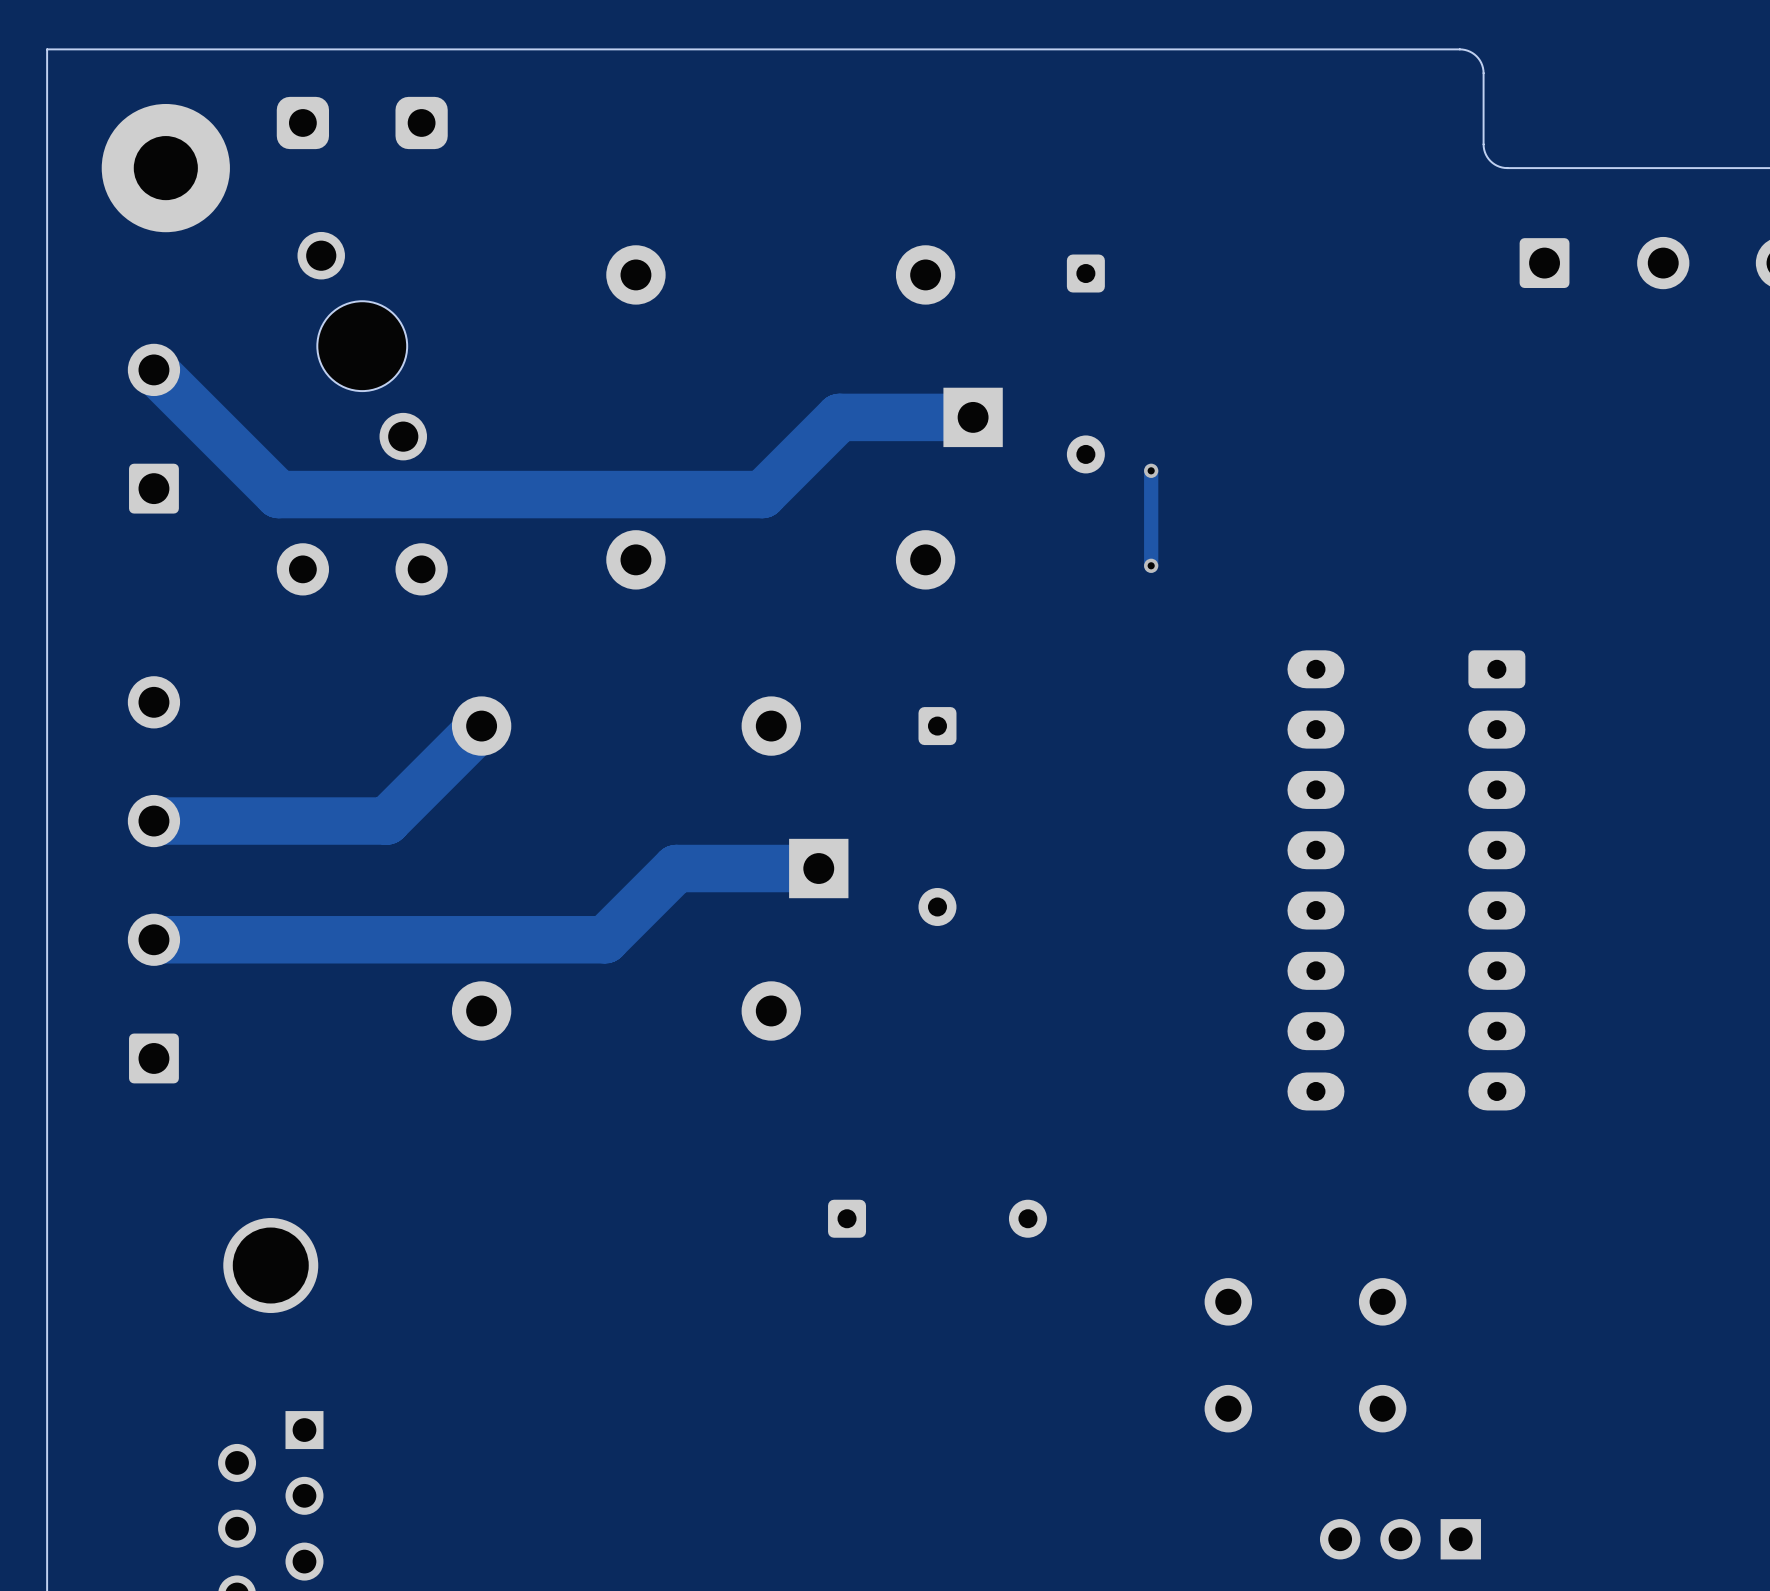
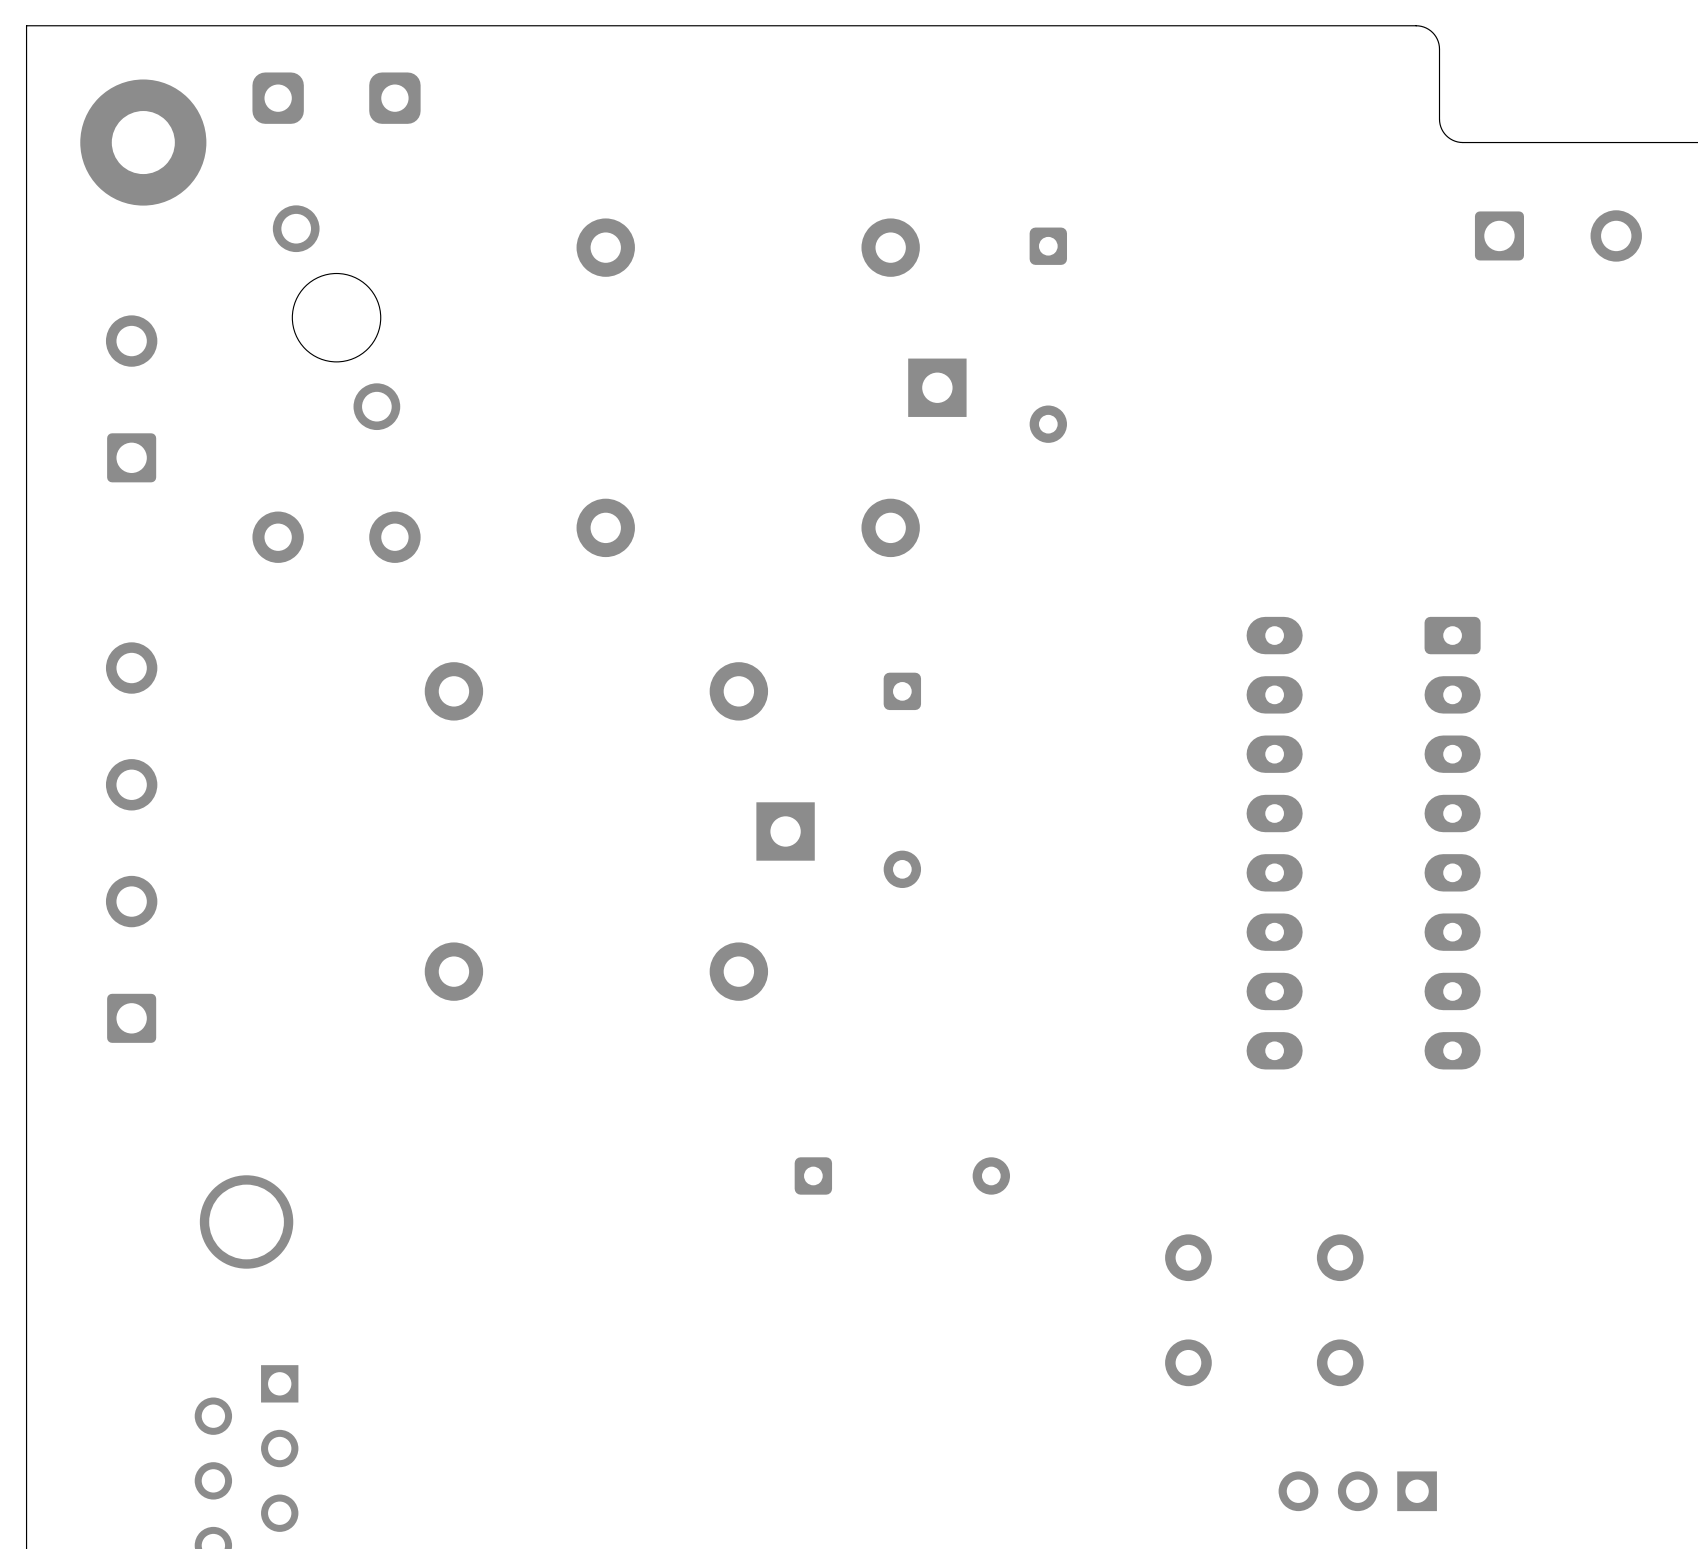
track: (153, 369) (278, 494) (762, 494) (839, 417) (973, 417) -> none
track: (1151, 470) (1151, 565) -> none
via: (1151, 470) -> none
via: (1151, 565) -> none
track: (481, 726) (386, 821) (153, 821) -> none
track: (818, 868) (676, 868) (605, 939) (153, 939) -> none

